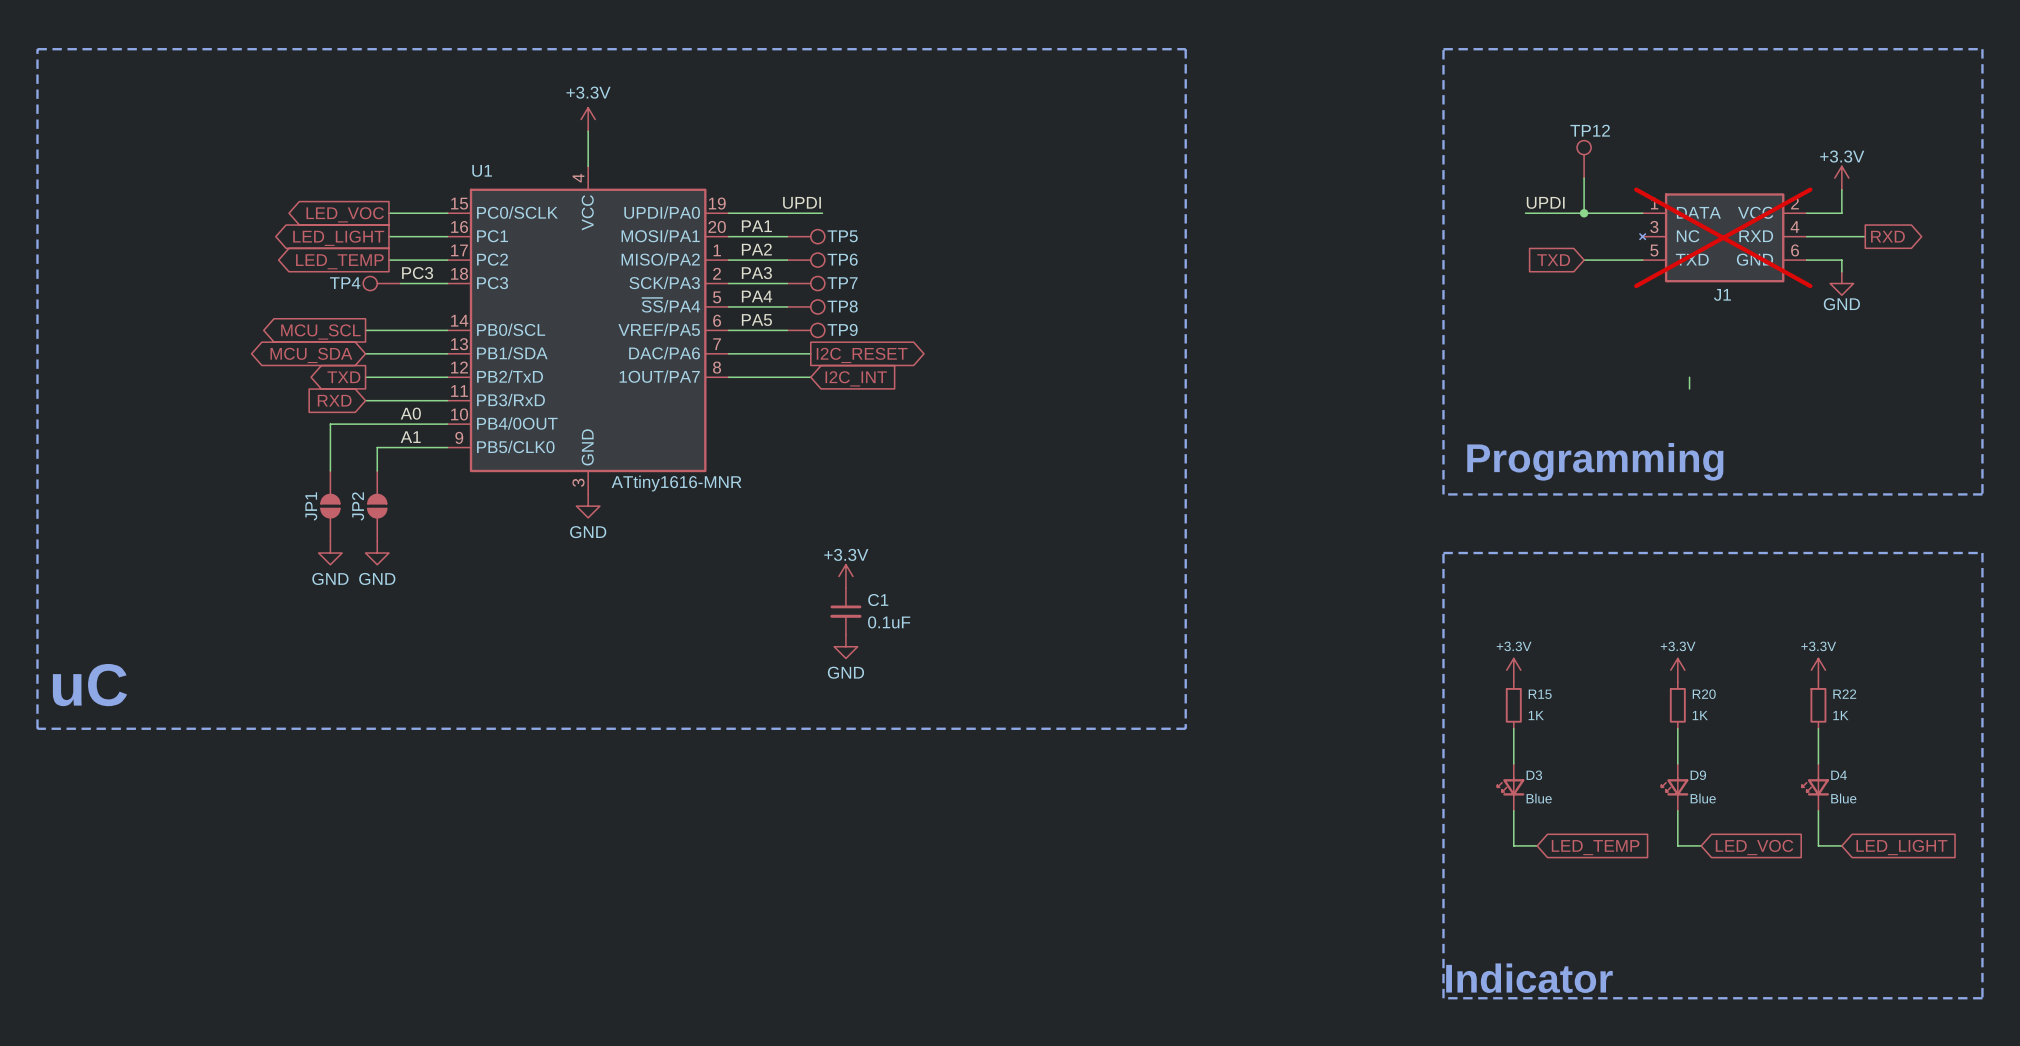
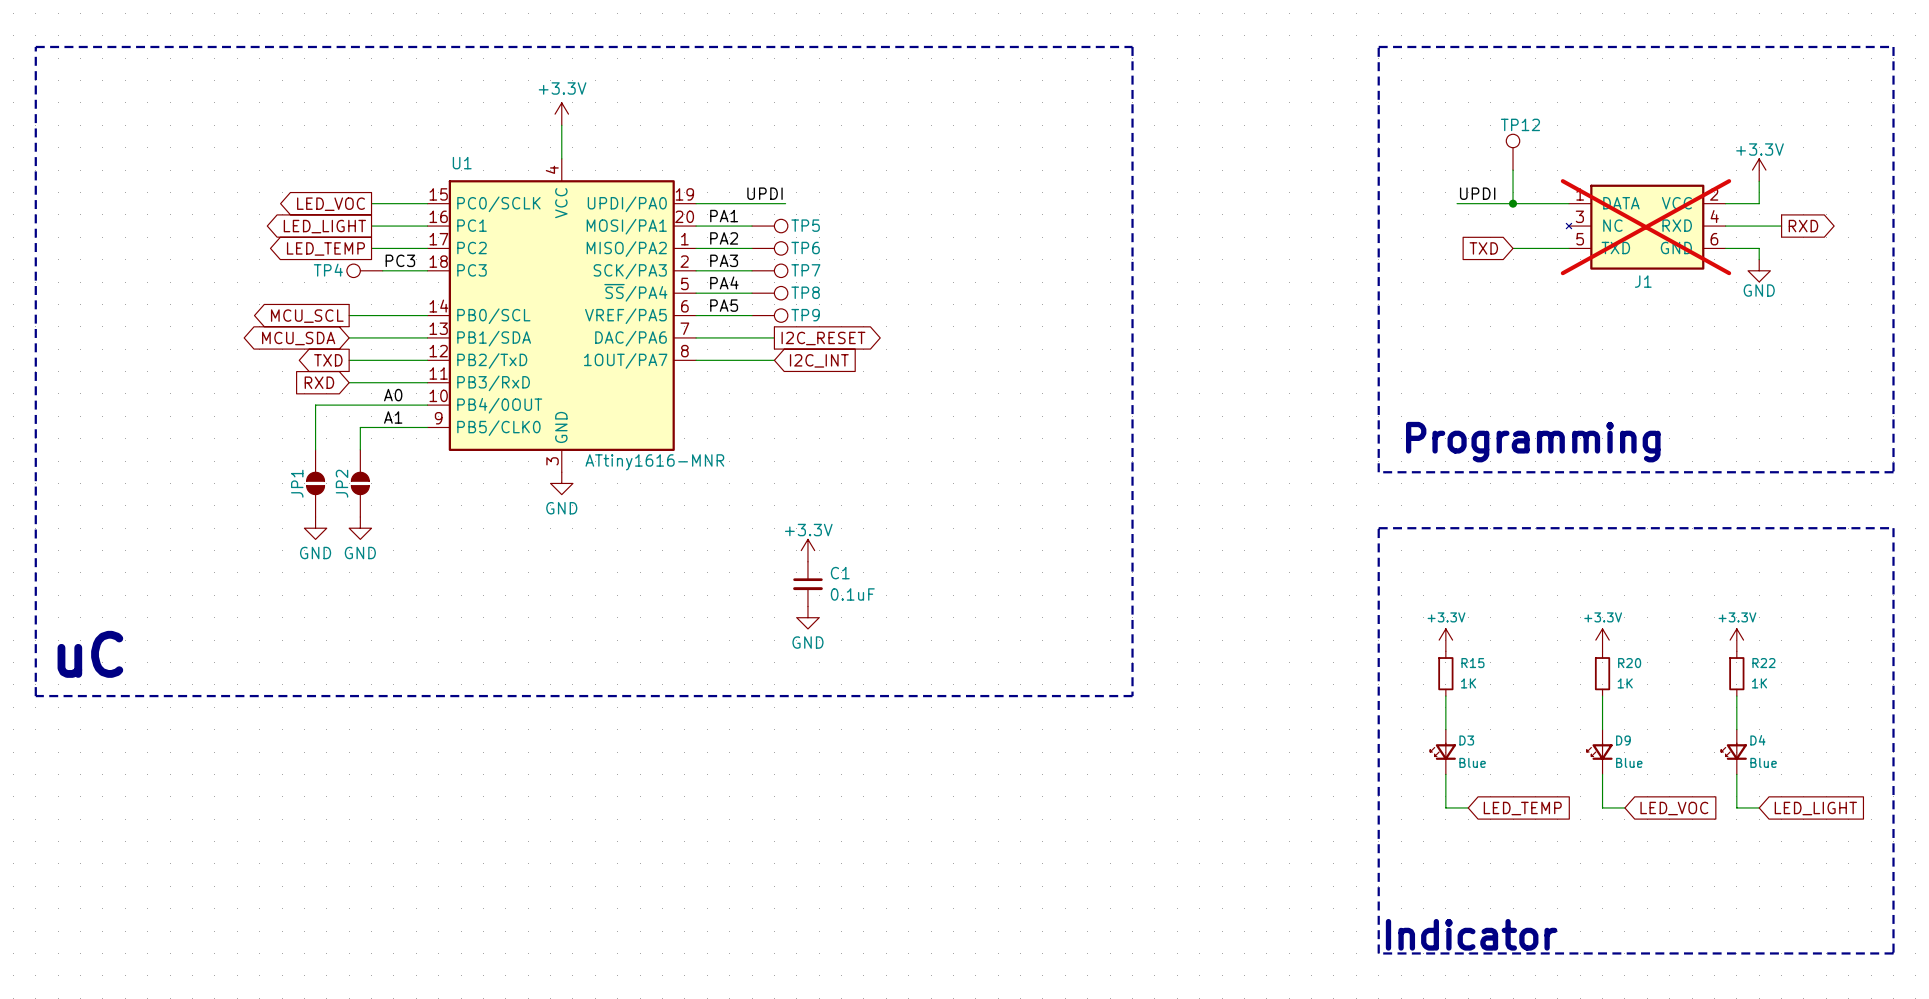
wire: (1689, 377) (1689, 388) -> none

